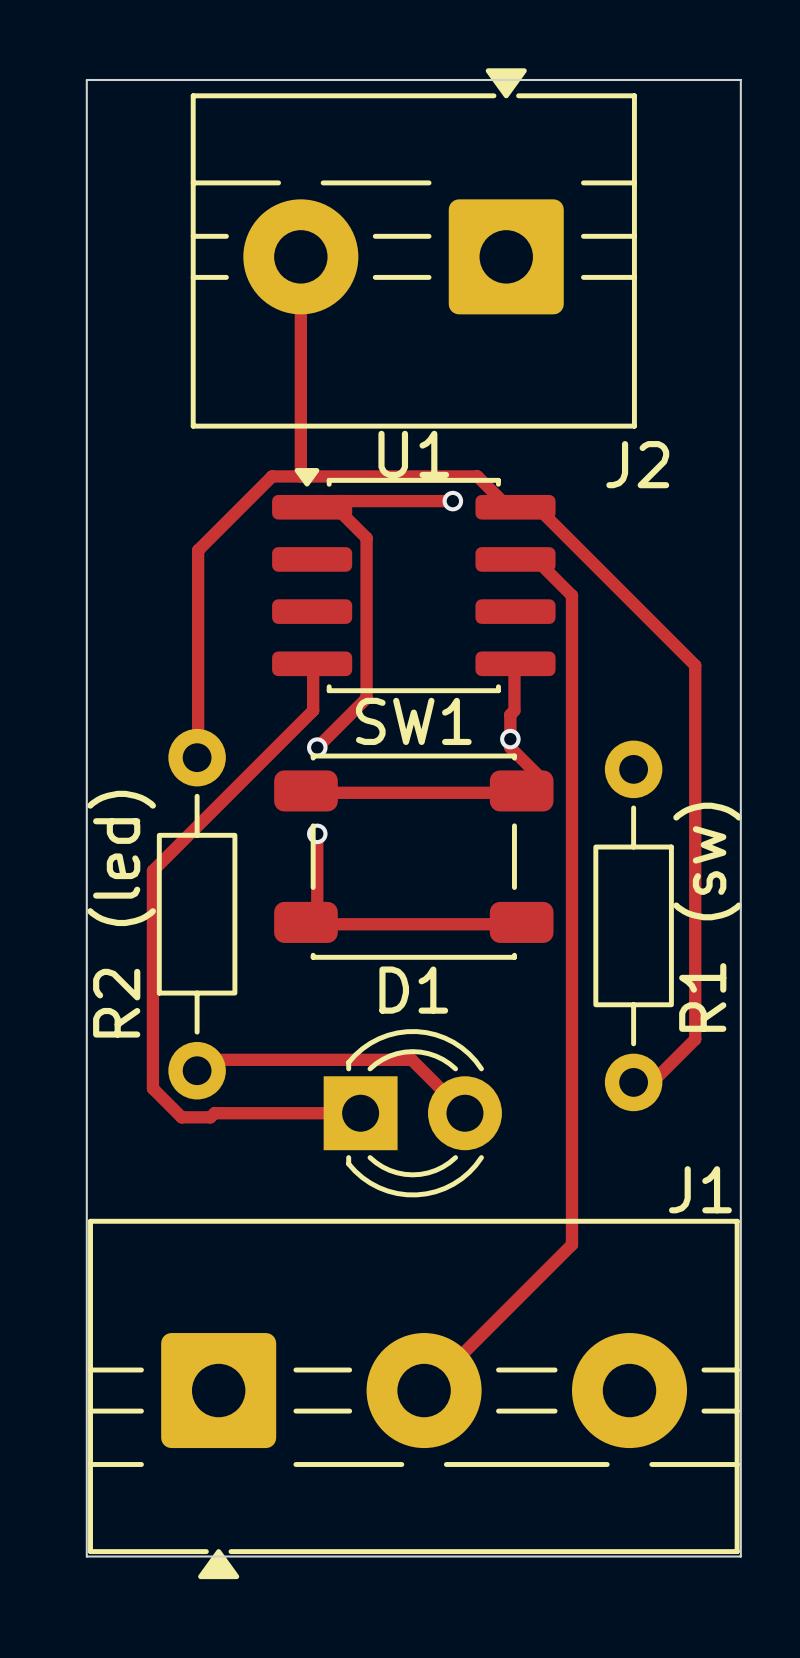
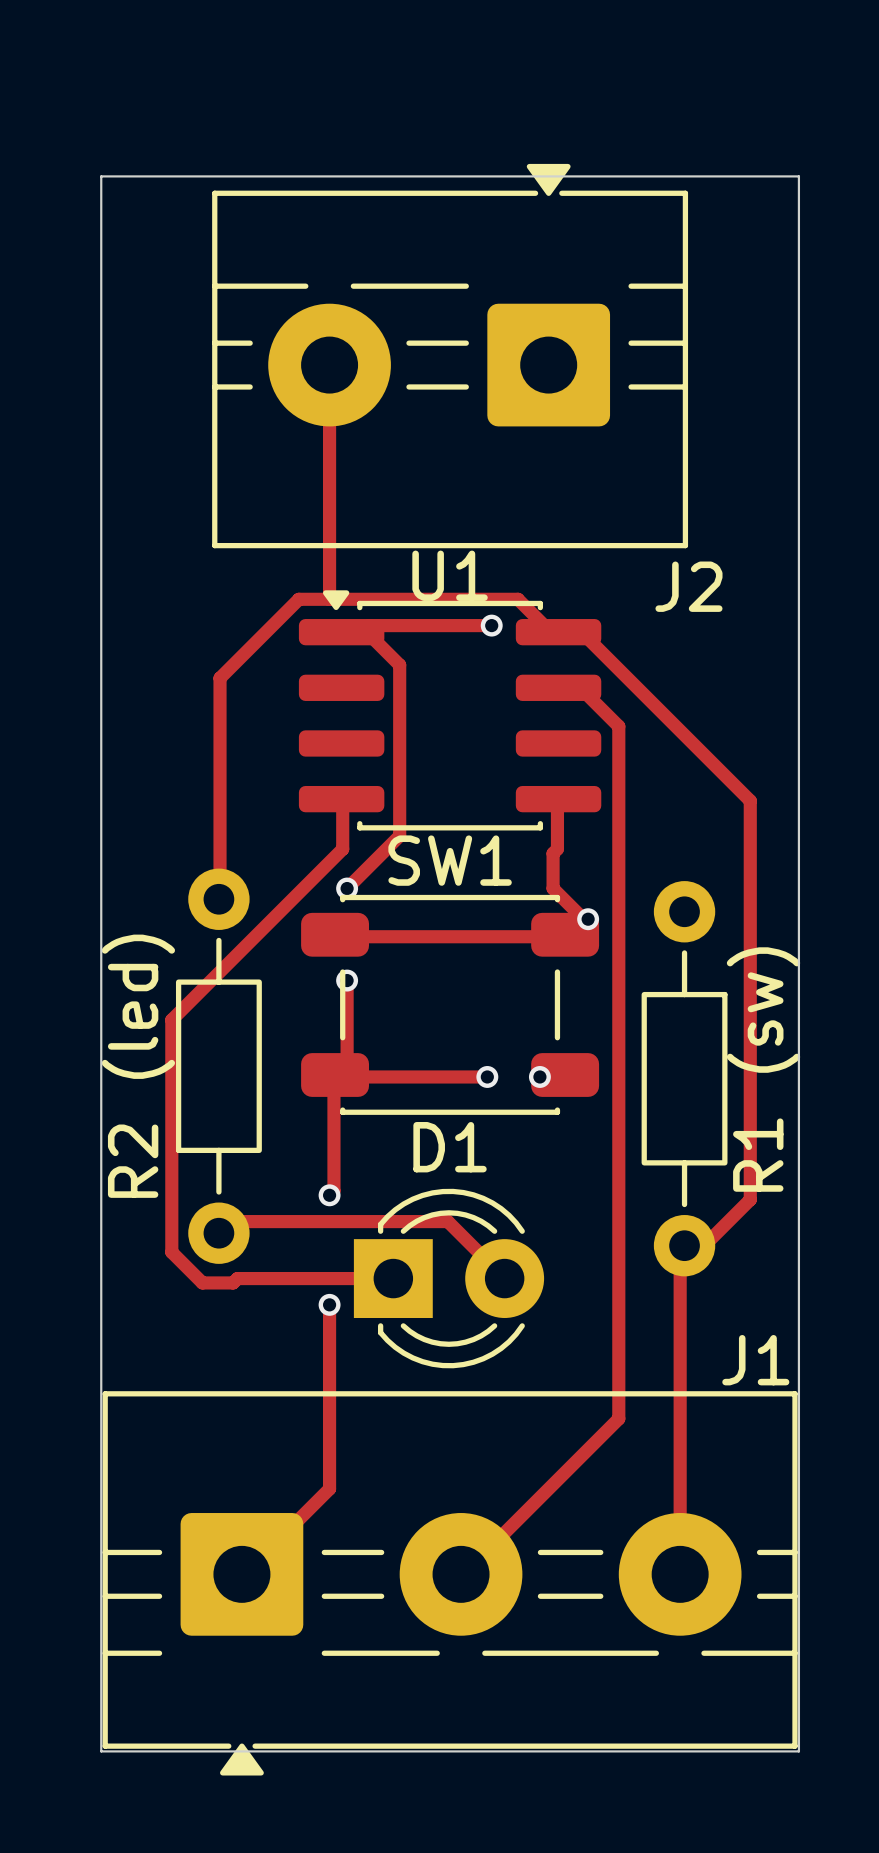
via position: (510, 739) -> (588, 919)
track: none -> (333, 1076) (333, 1190) (329, 1195)
track: (448, 924) (498, 924) -> none
via: none -> (487, 1076)
via: none -> (539, 1076)
via: none -> (329, 1195)
track: none -> (680, 1269) (680, 1576)
track: none -> (329, 1304) (329, 1488) (241, 1576)
via: none -> (329, 1304)

